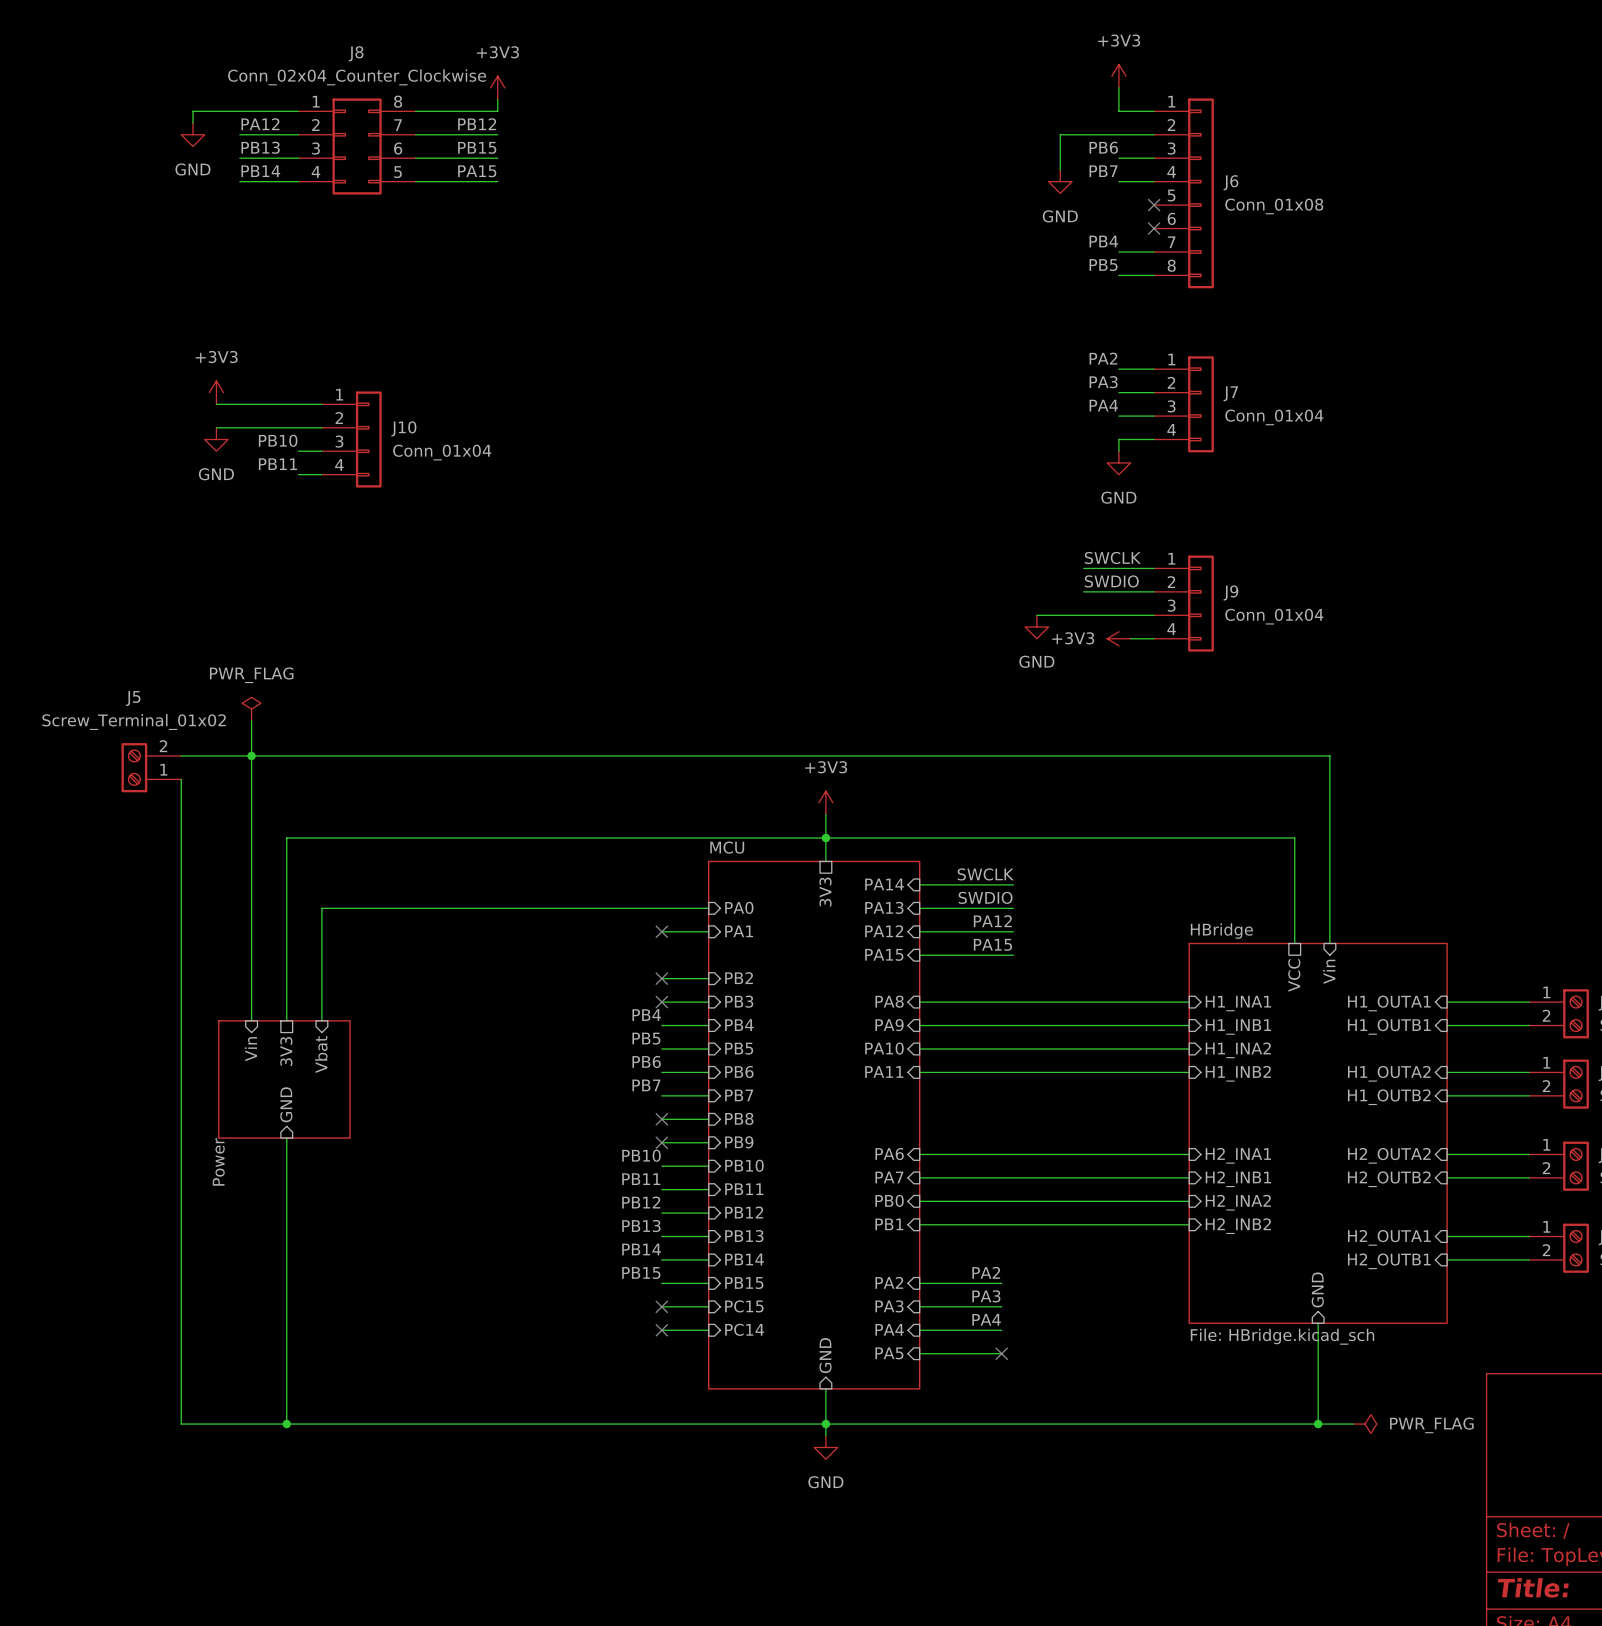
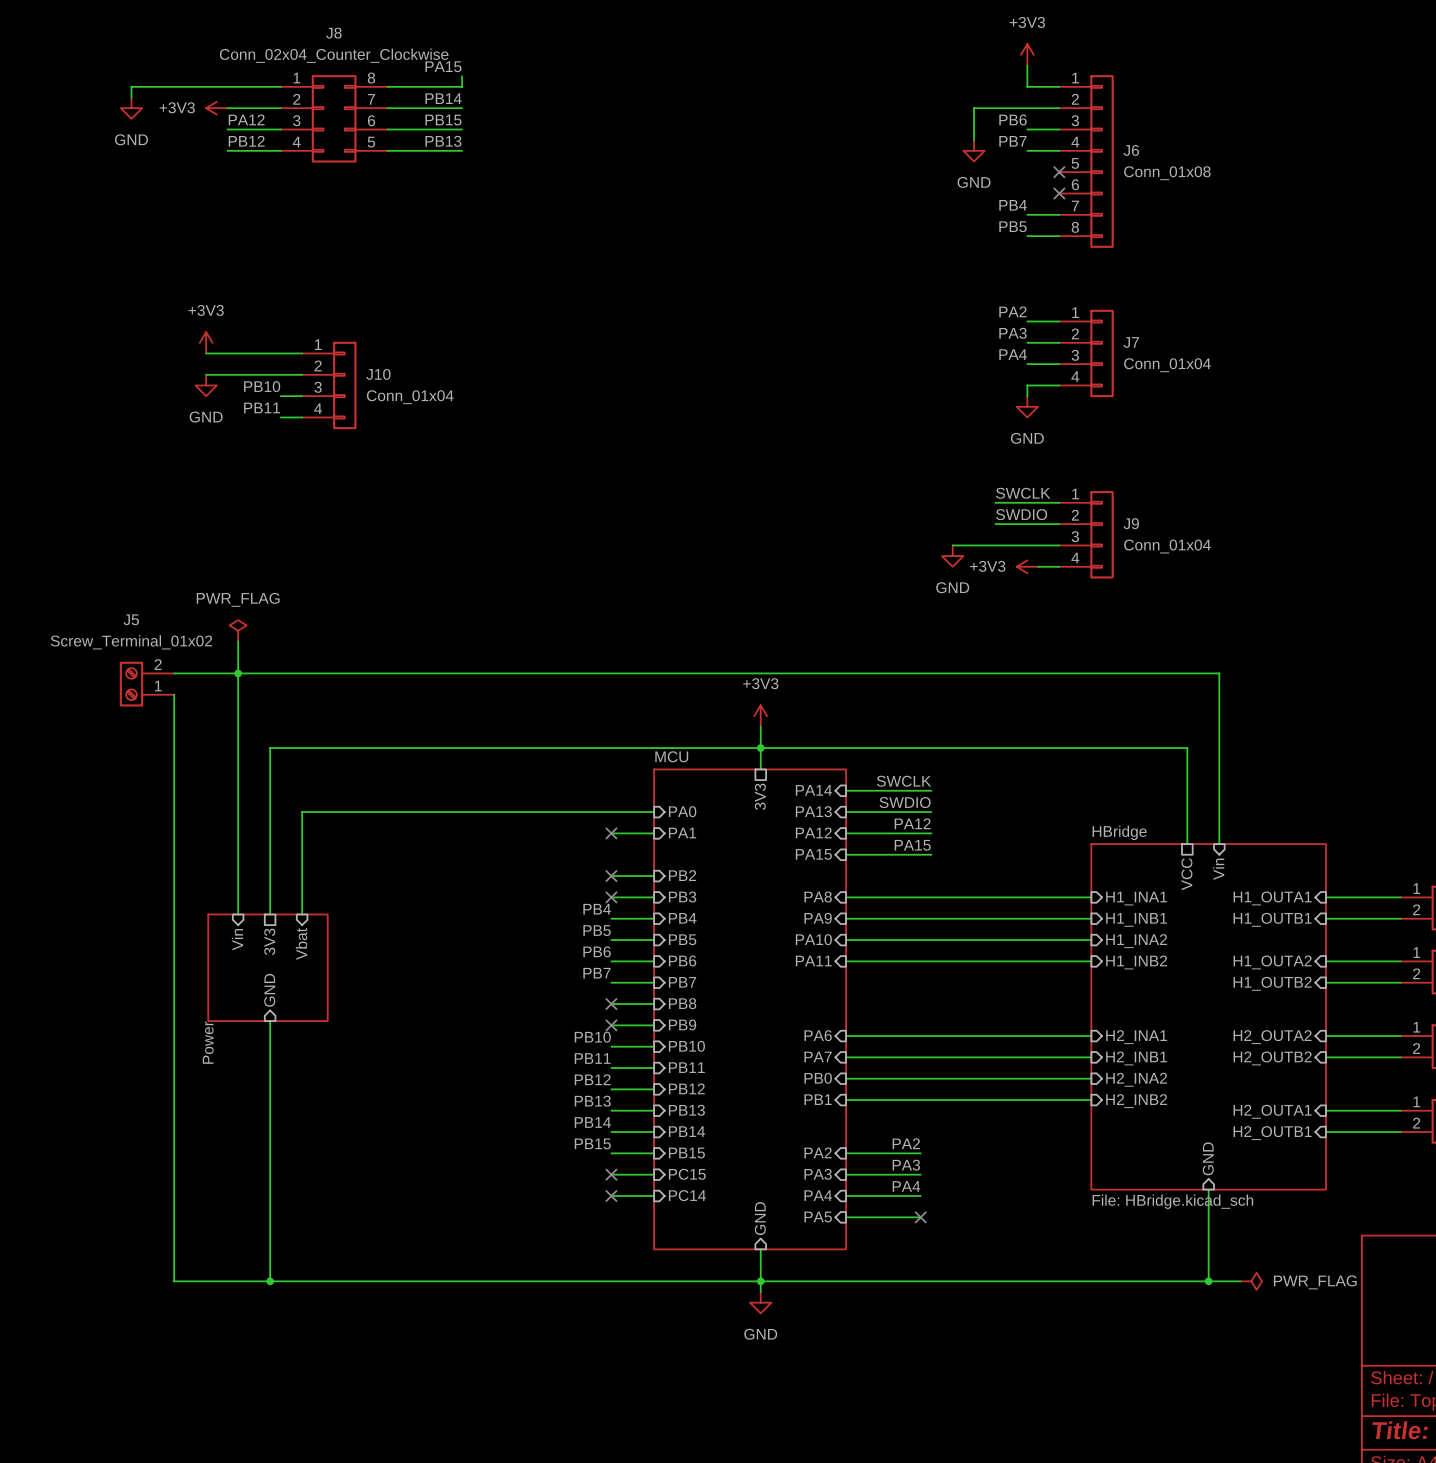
power symbol: +3V3 (497, 87) -> none
label: none -> PA15 (443, 66)
wire: (192, 111) (192, 123) -> (184, 86) (131, 86) (131, 97)
label: PA12 (260, 124) -> none
label: PB12 (477, 124) -> PB14 (443, 98)
power symbol position: GND (192, 134) -> GND (131, 108)
power symbol: none -> +3V3 (216, 108)
label: PB13 (260, 147) -> PA12 (246, 119)
label: PB14 (260, 171) -> PB12 (246, 141)
label: PA15 (477, 171) -> PB13 (443, 141)

